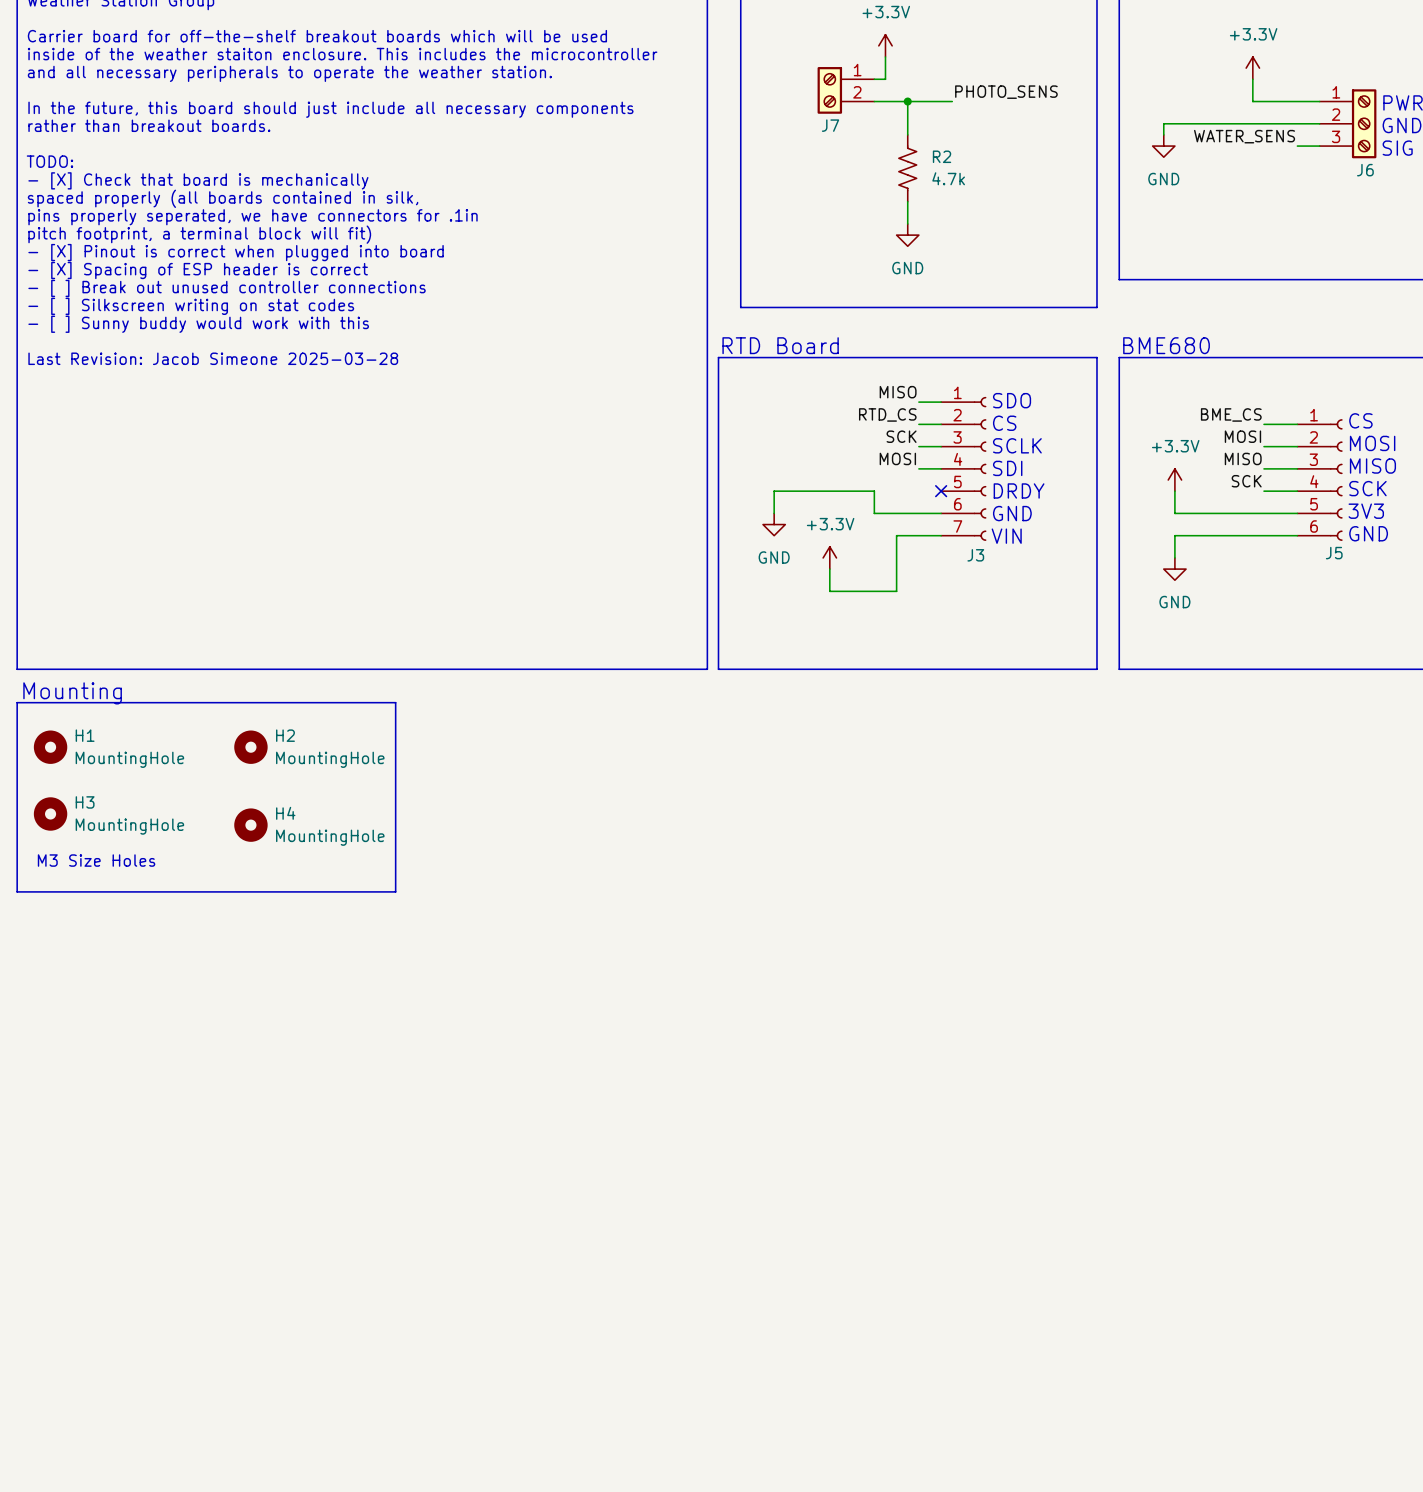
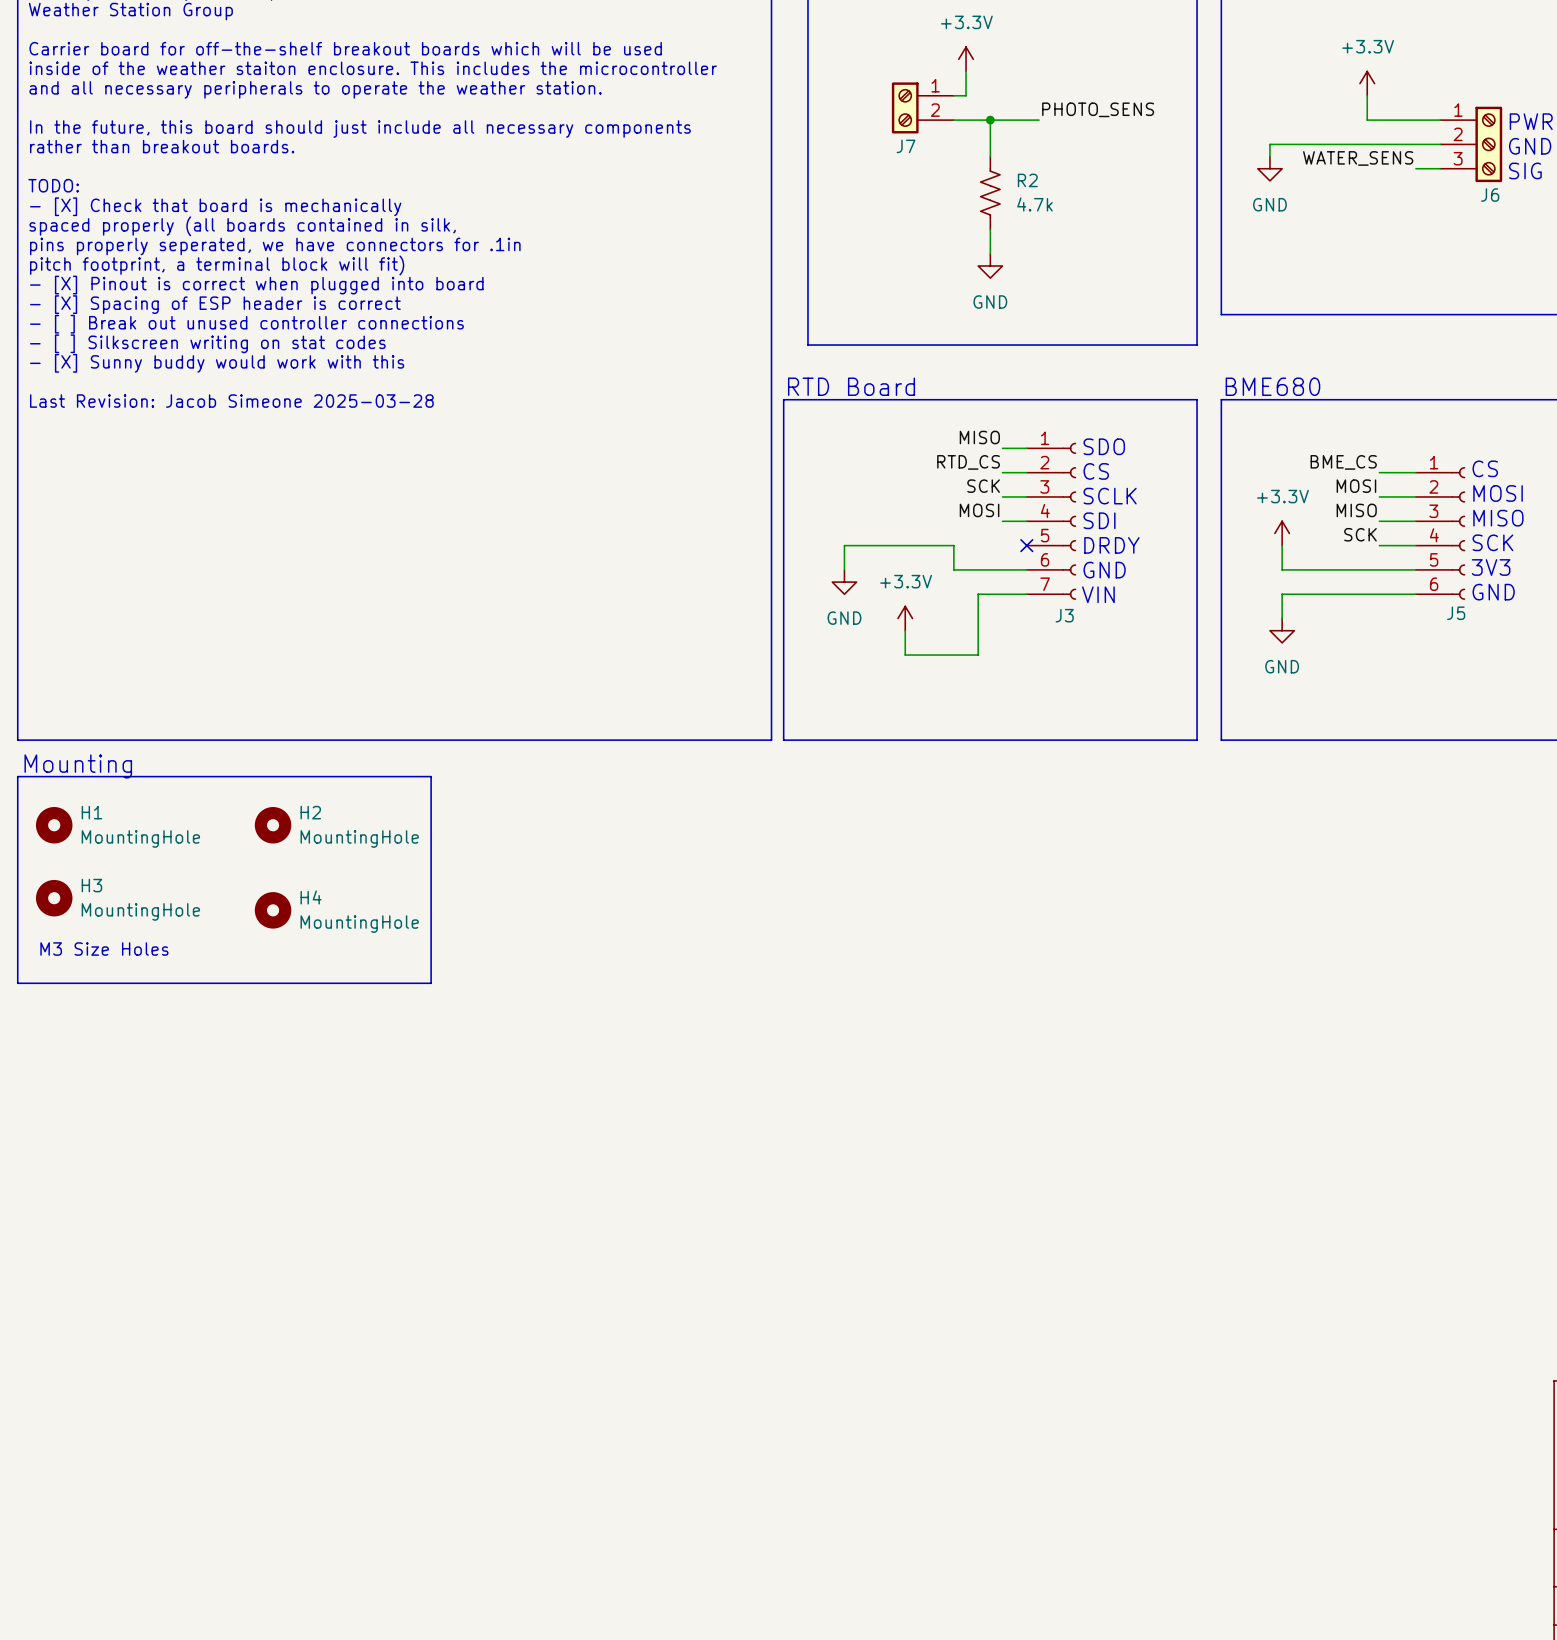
text: - [ ] Sunny buddy would work with this (198, 324) -> - [X] Sunny buddy would work with this (217, 363)

